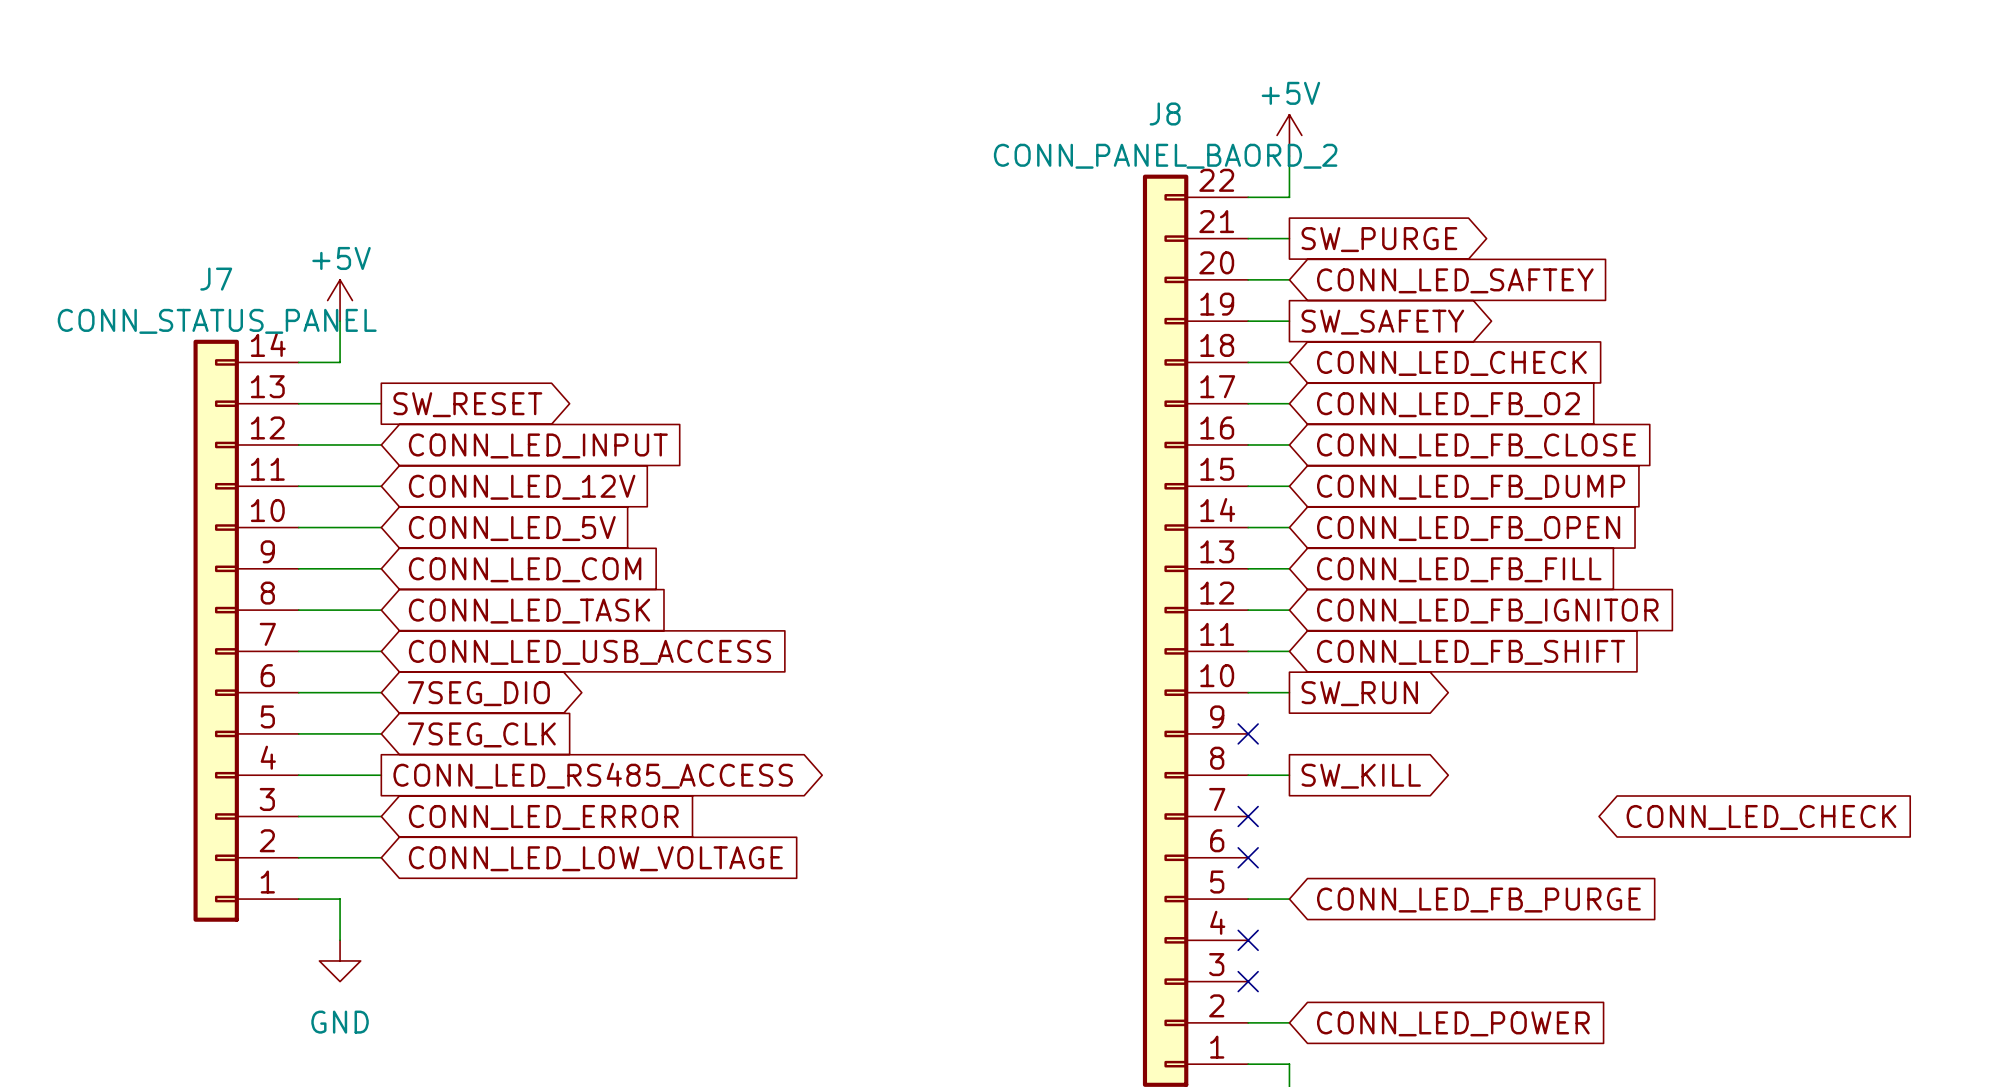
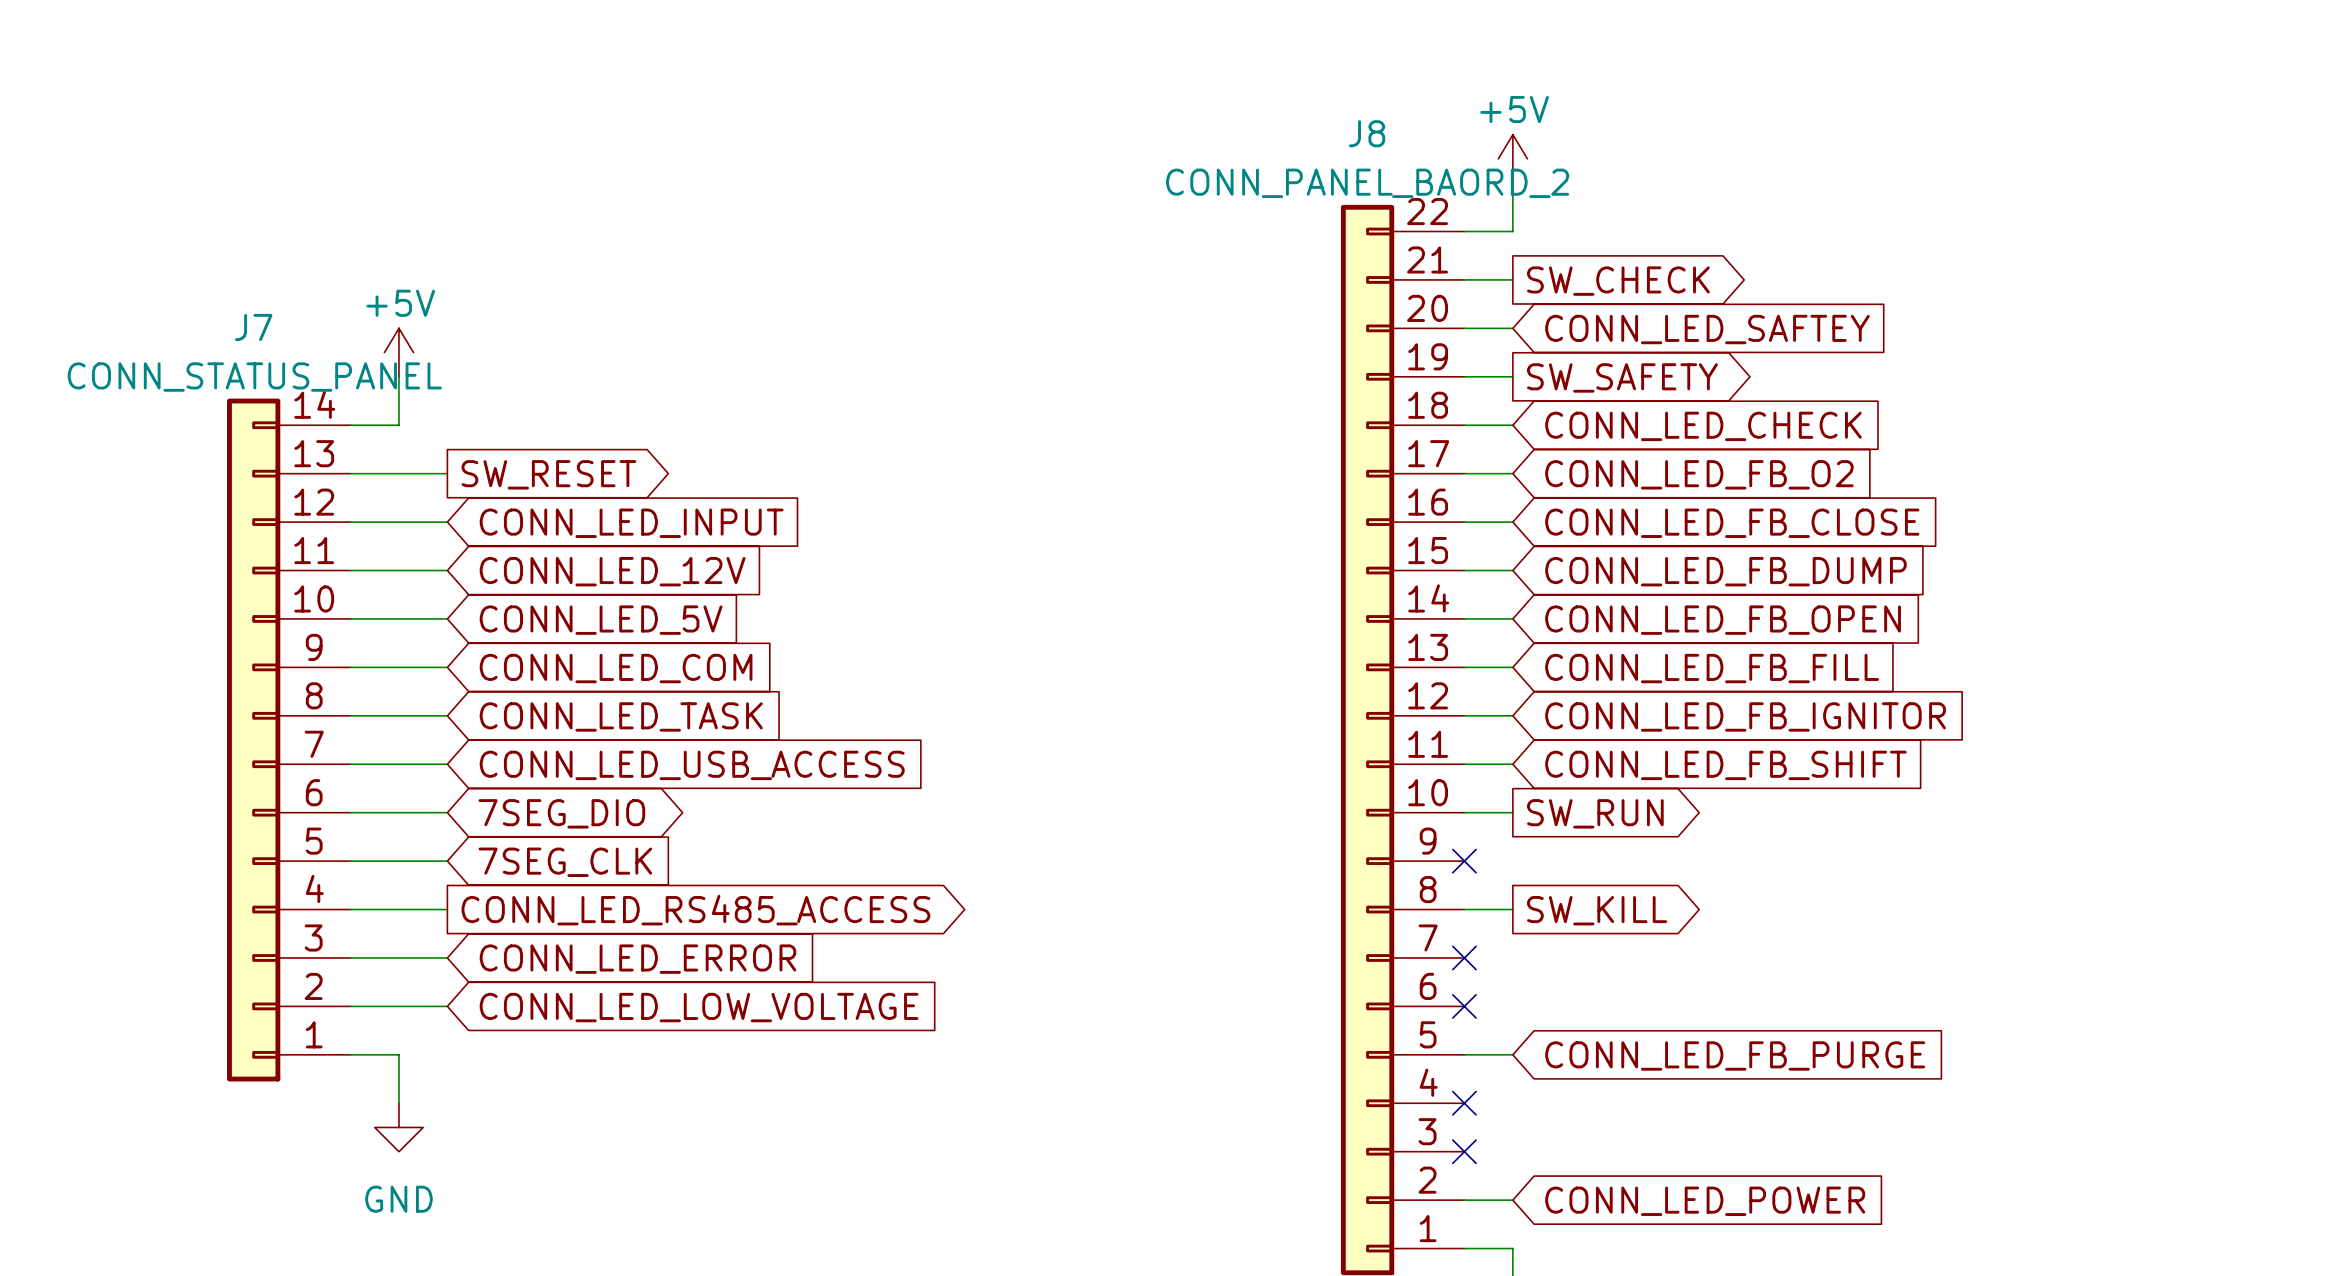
global label: SW_PURGE (1379, 239) -> SW_CHECK (1618, 281)
global label: CONN_LED_CHECK (1761, 817) -> none

